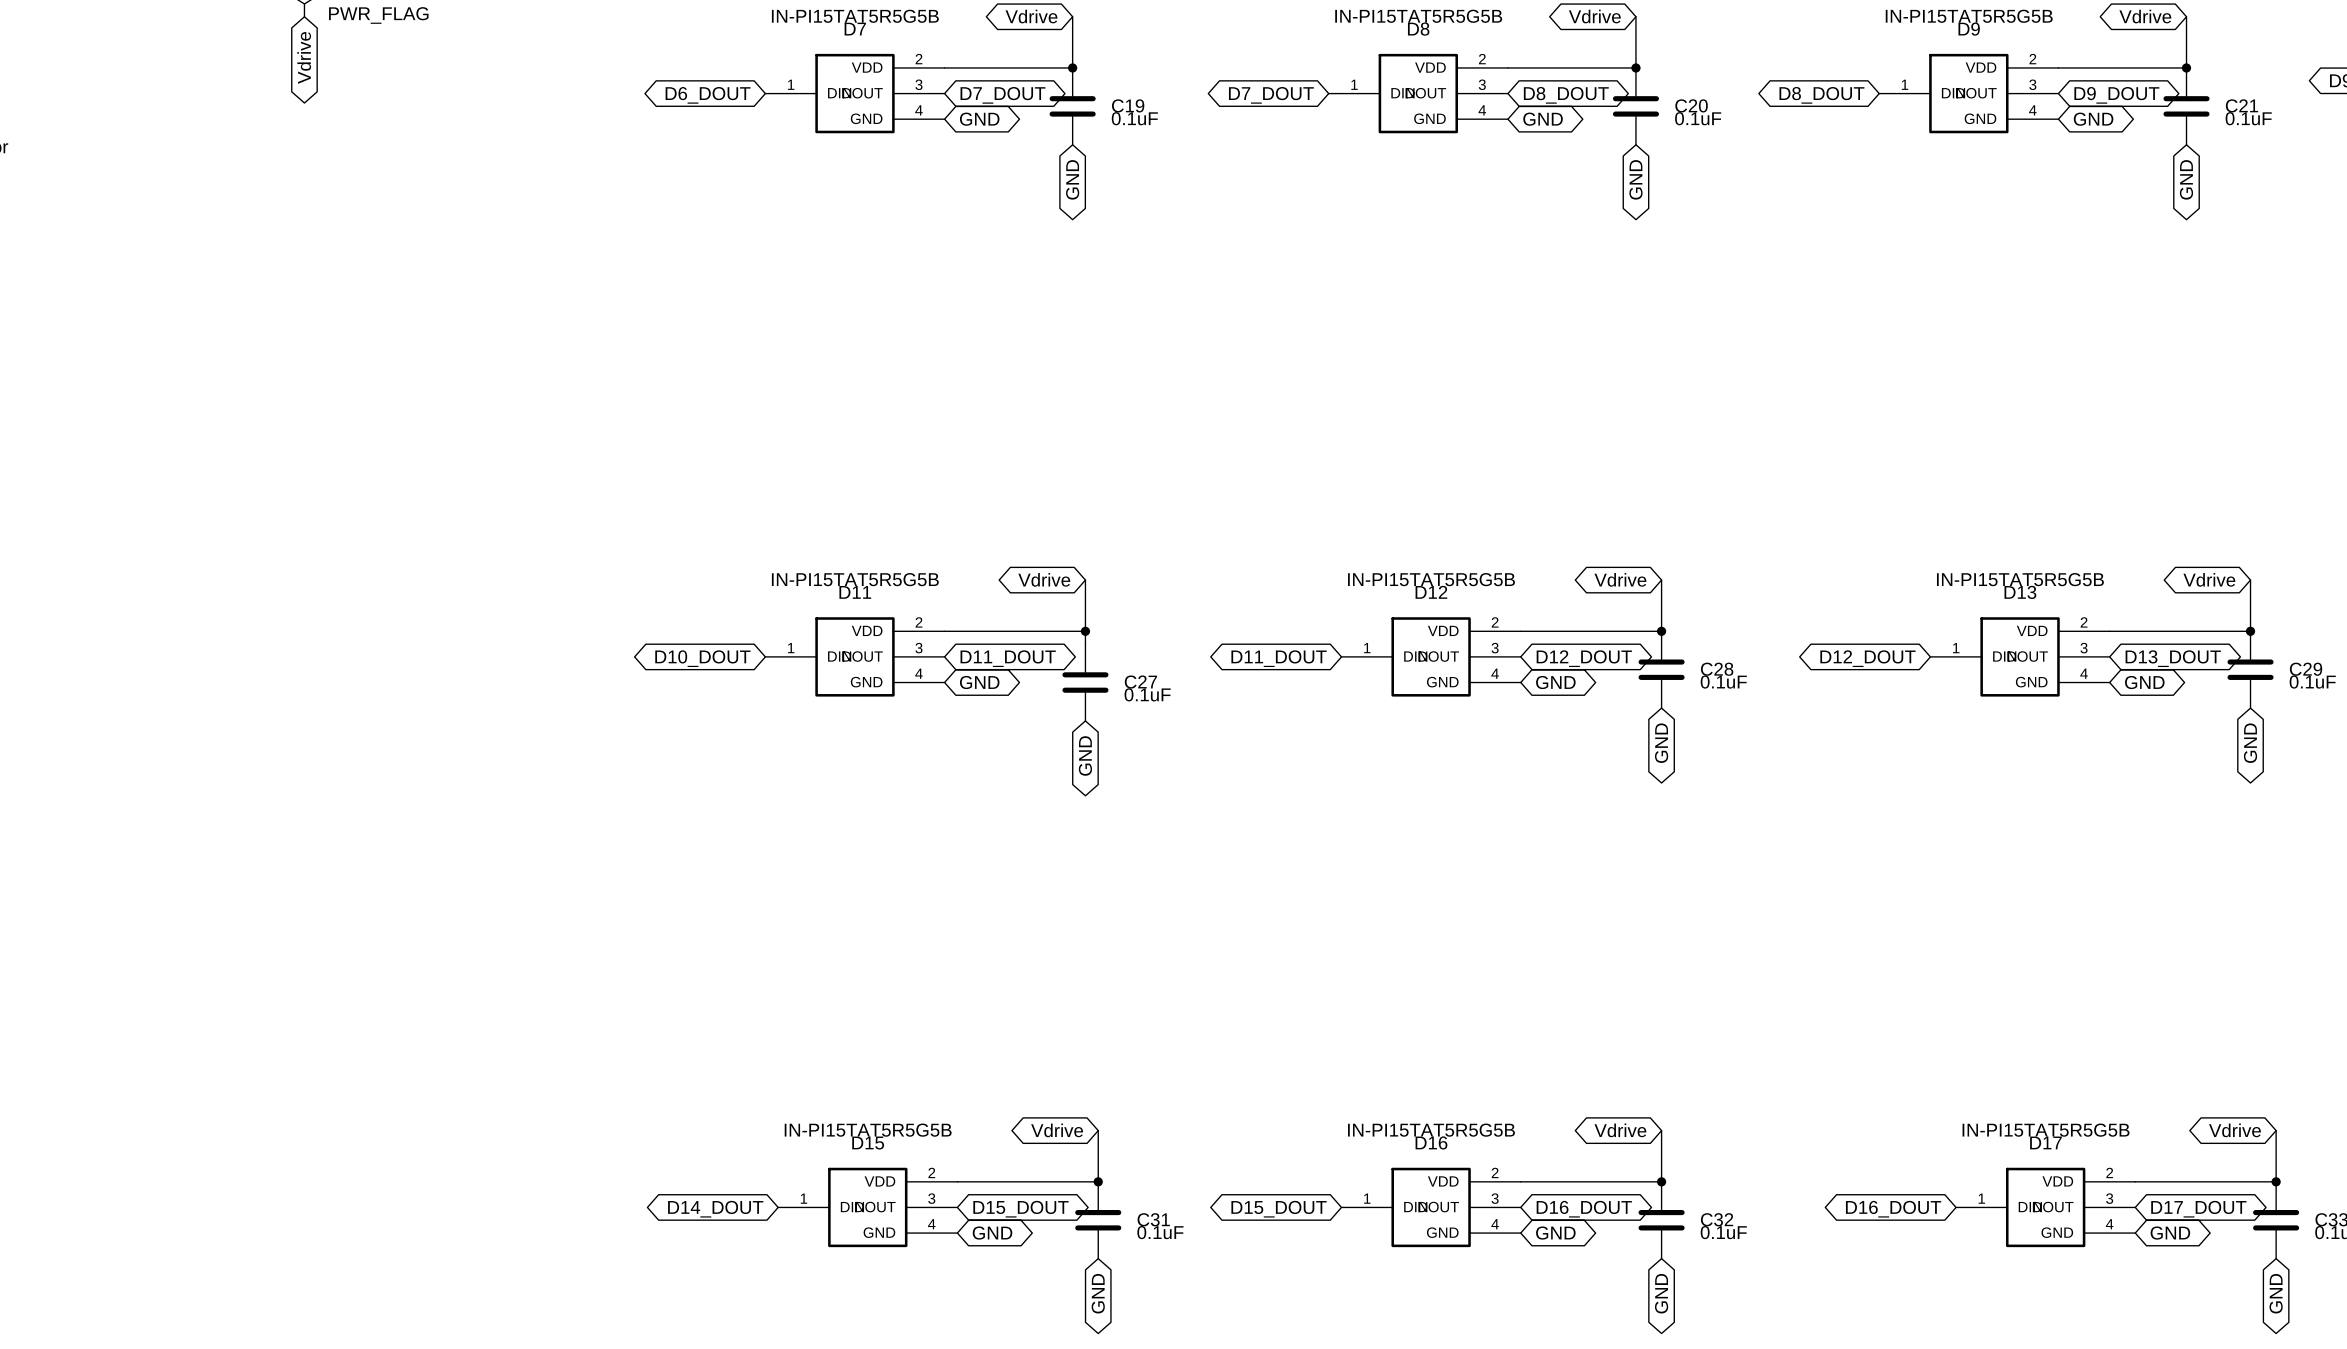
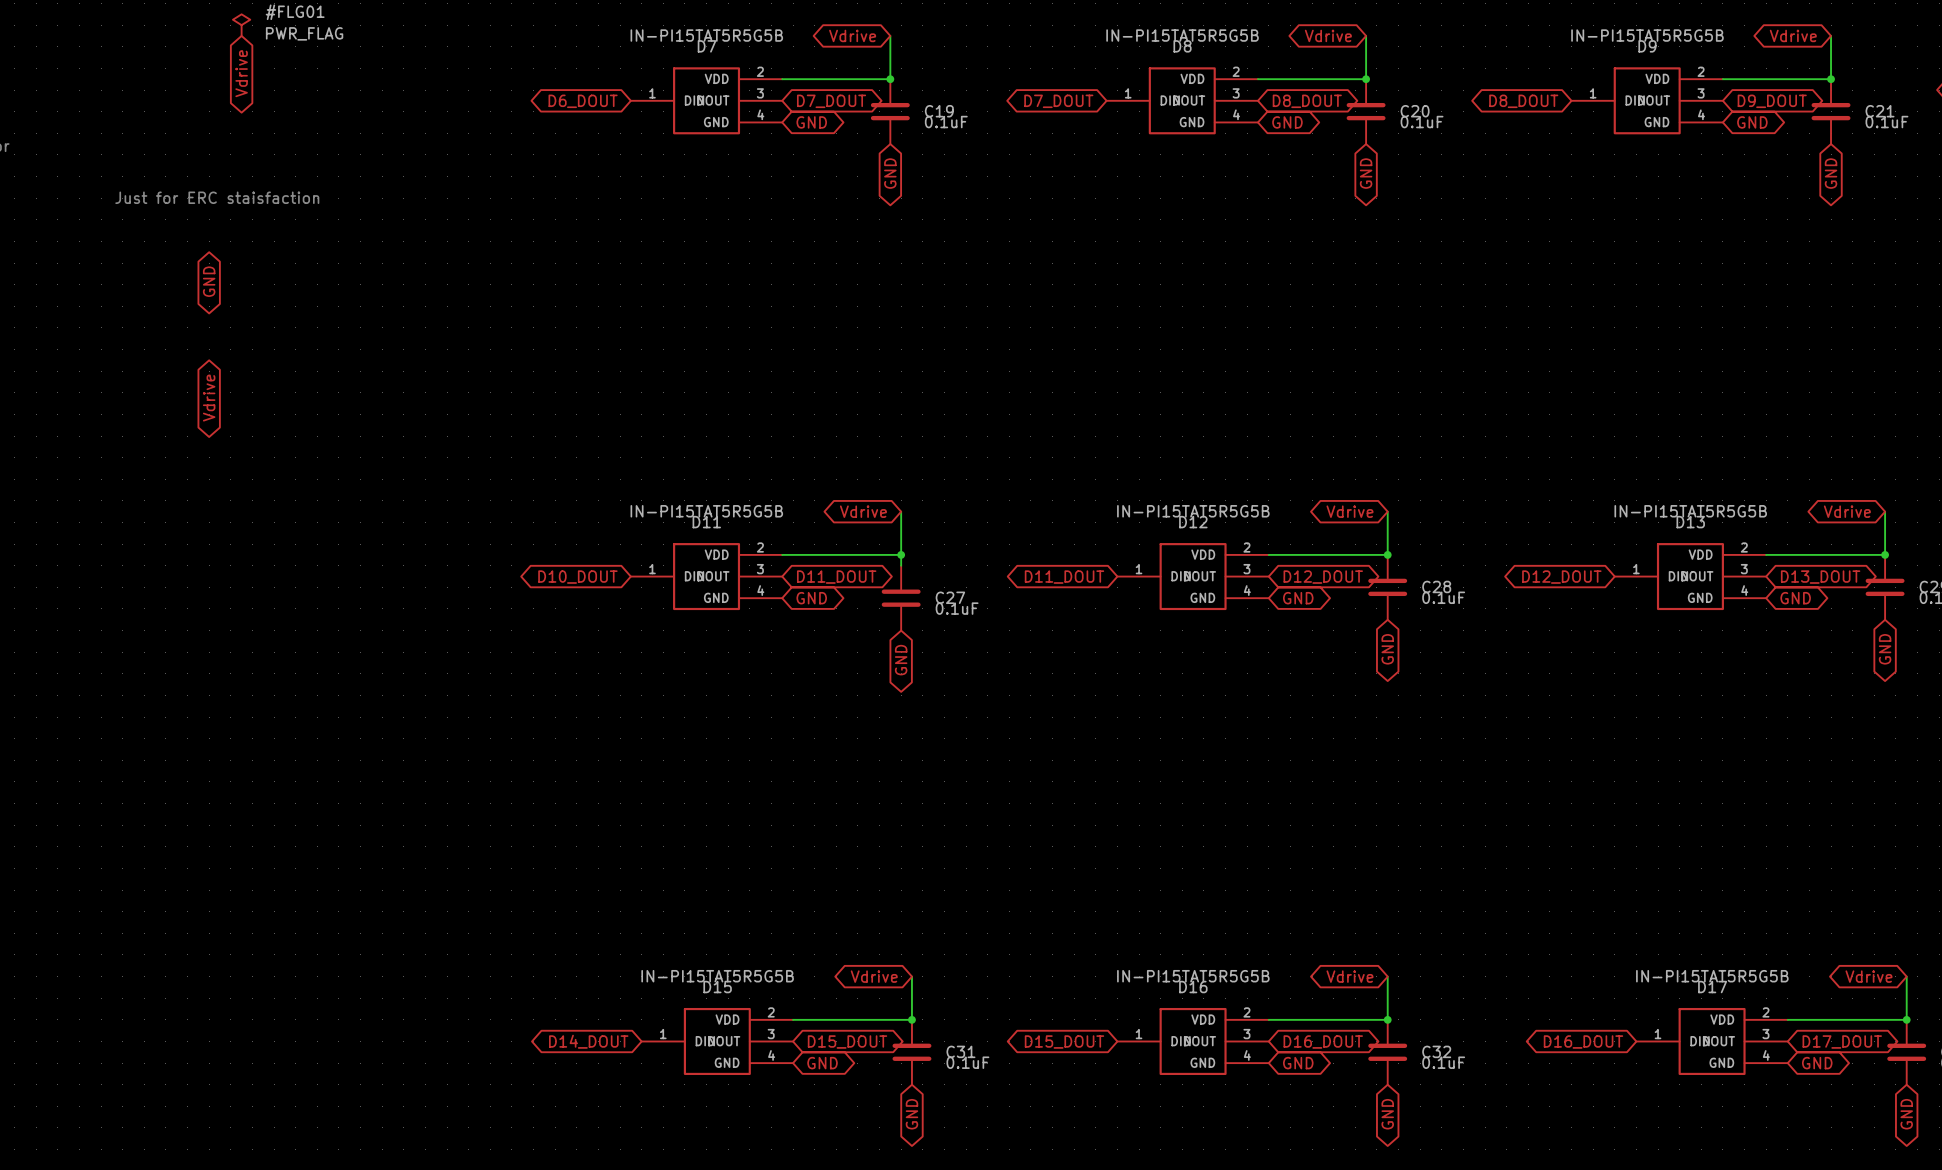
text: none -> Just for ERC staisfaction (217, 197)
global label: none -> GND (209, 281)
global label: none -> Vdrive (209, 398)

